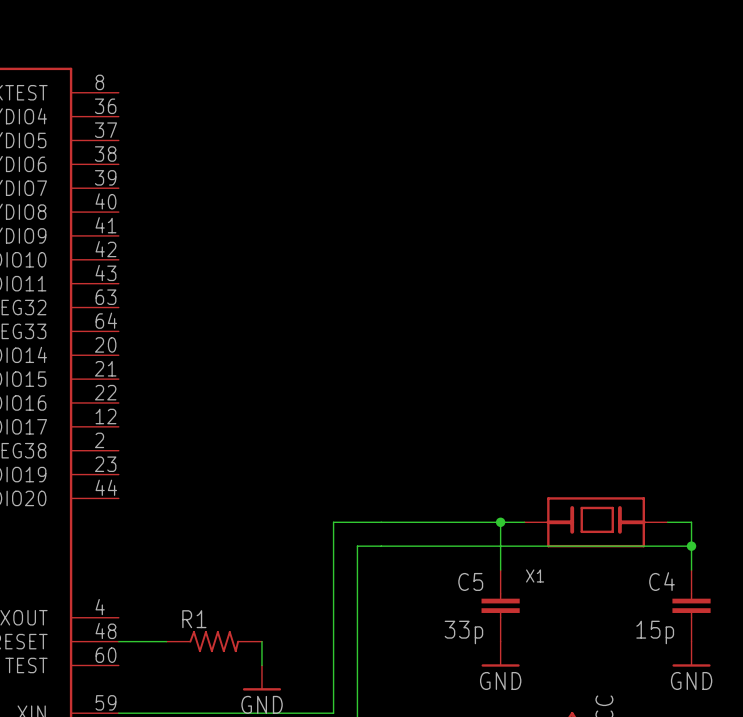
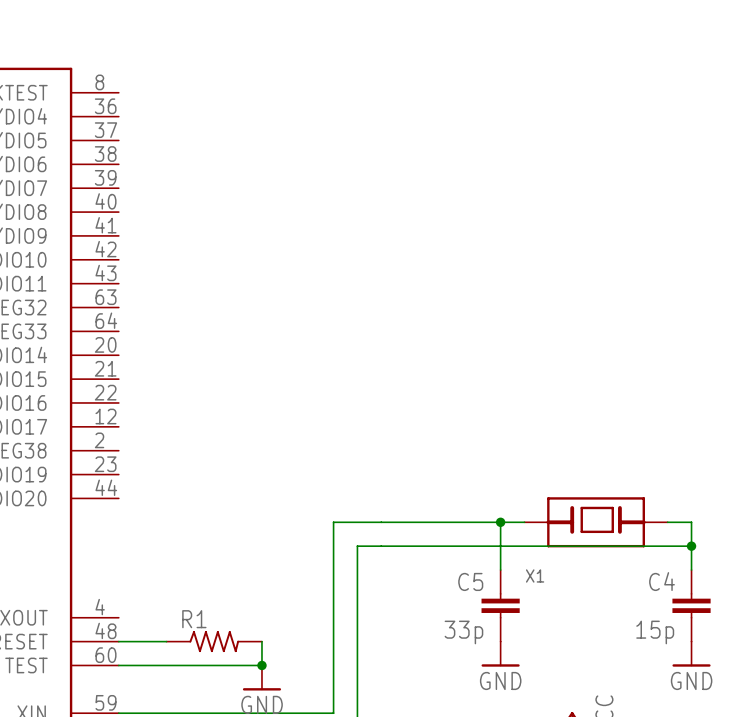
wire: none -> (118, 665) (261, 665)
junction: none -> (261, 665)

